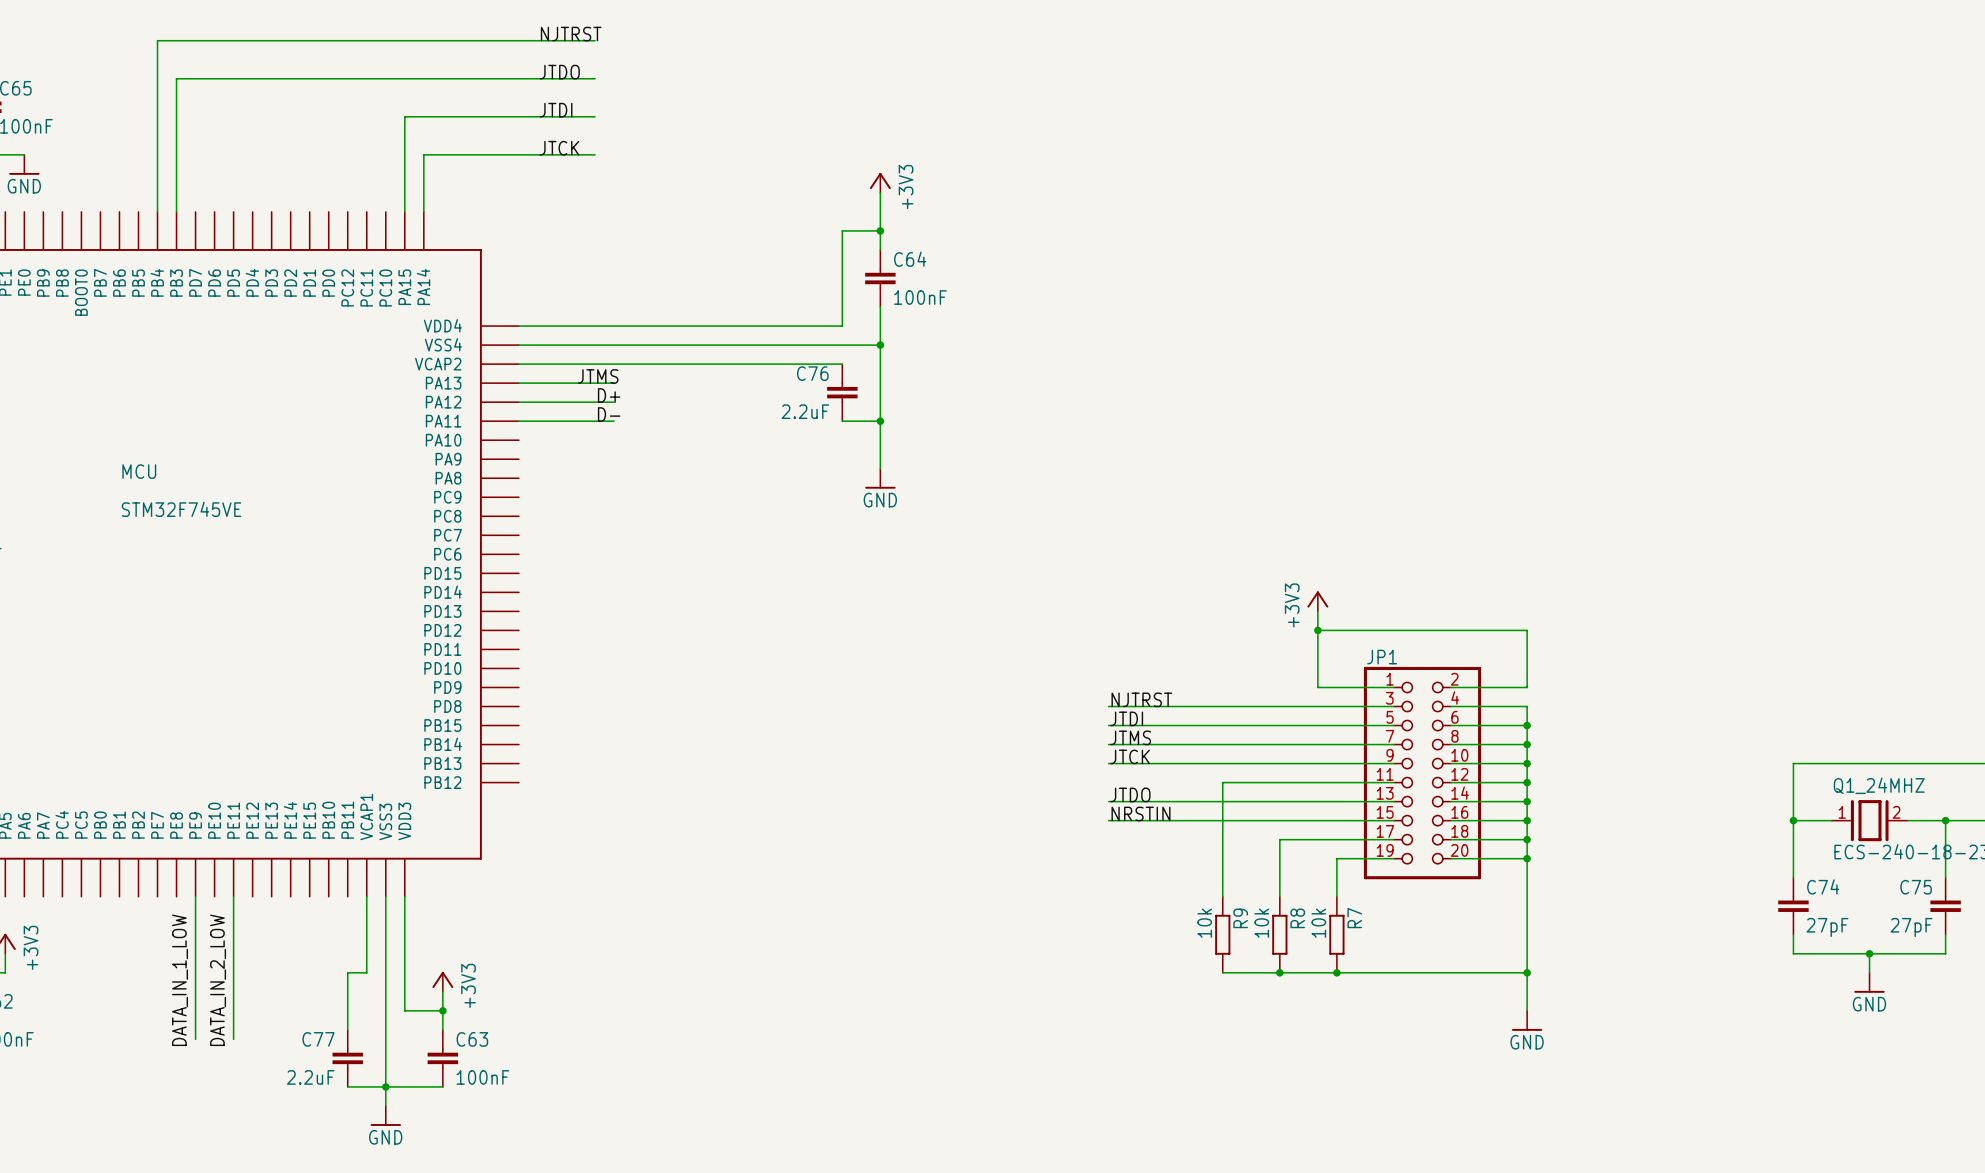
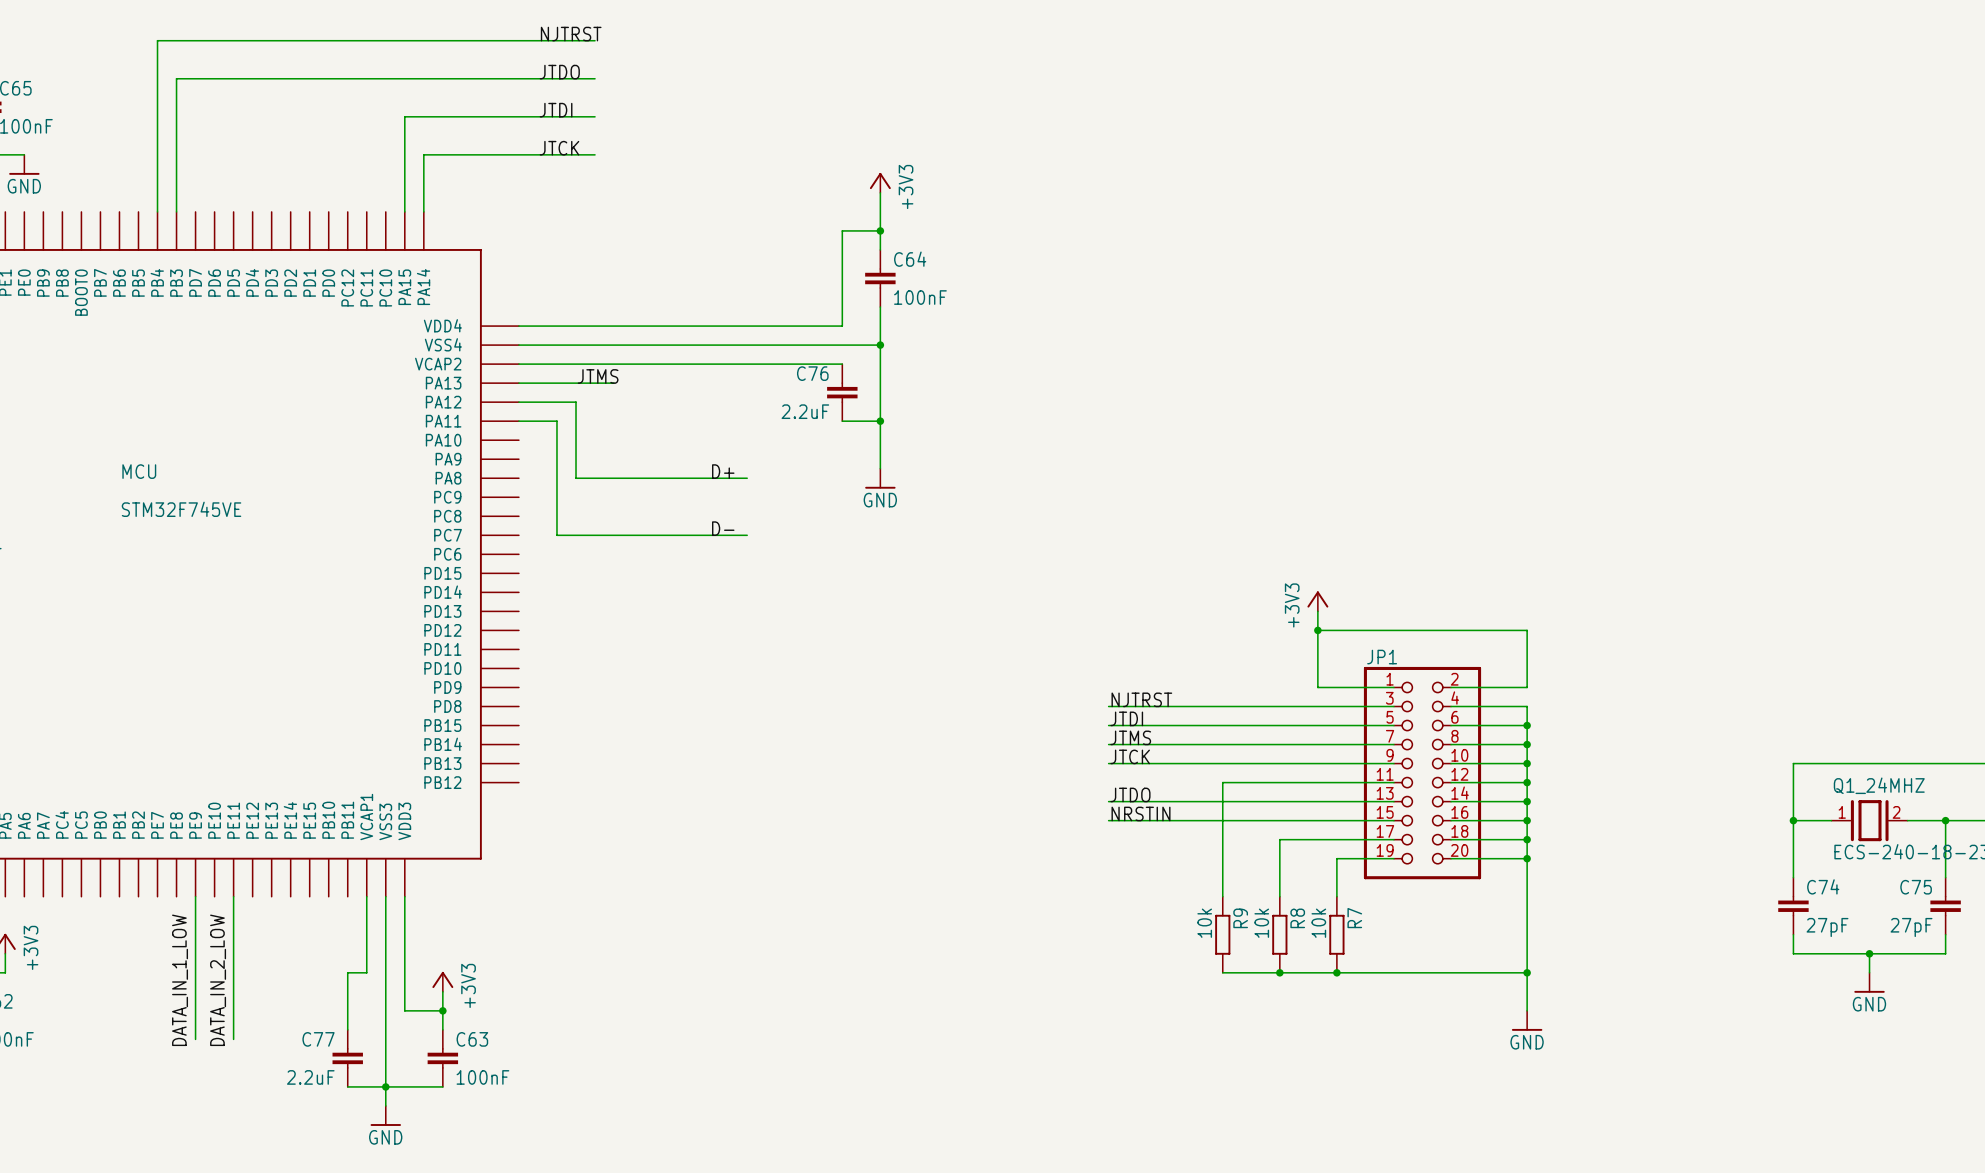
label position: D+ (609, 395) -> D+ (723, 471)
wire: (576, 402) (614, 402) -> (576, 402) (576, 478) (747, 478)
label position: D- (609, 414) -> D- (723, 528)
wire: (556, 421) (614, 421) -> (556, 421) (556, 535) (747, 535)

